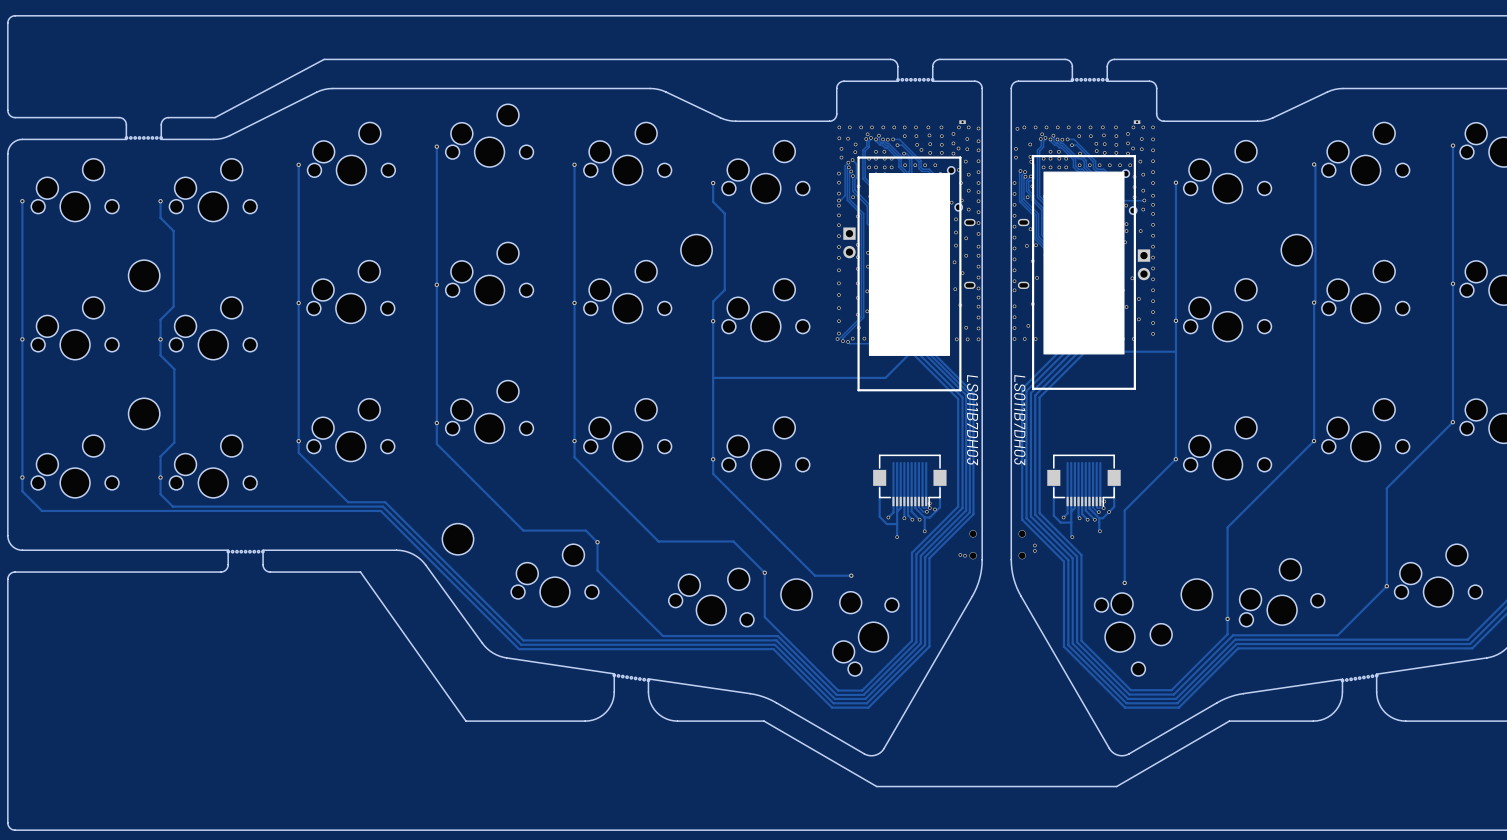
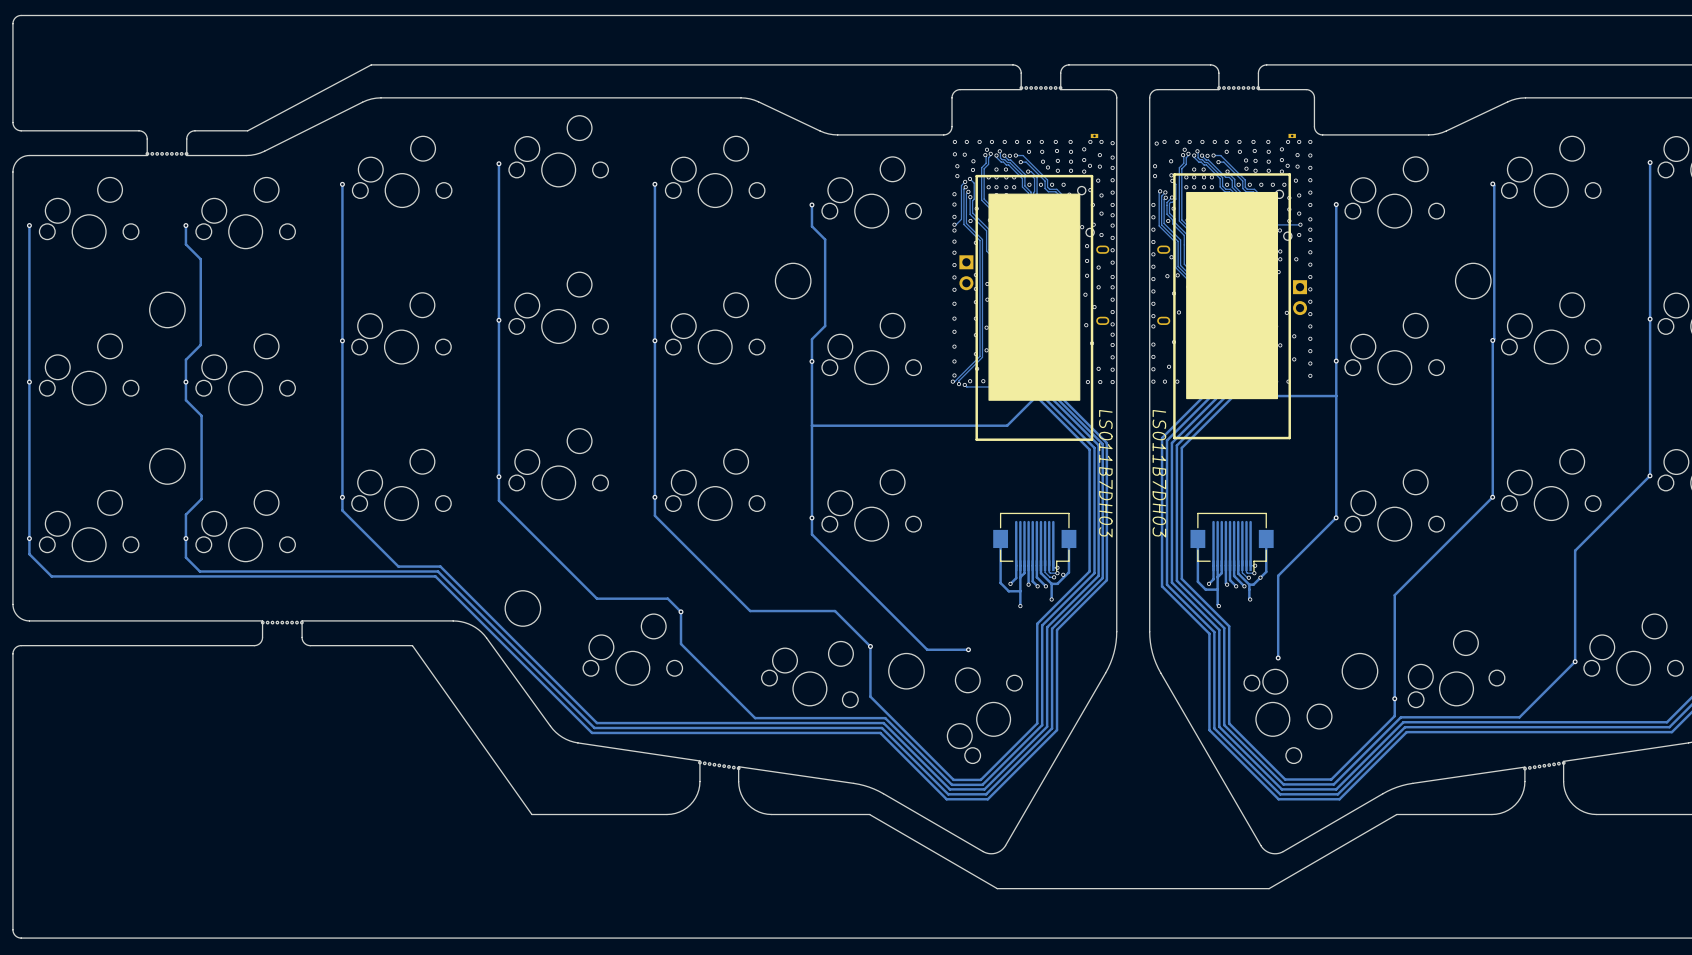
part: (973, 544) -> none
part: (1022, 544) -> none
via: (1034, 545) -> none
via: (1034, 550) -> none
via: (960, 554) -> none
via: (965, 555) -> none

